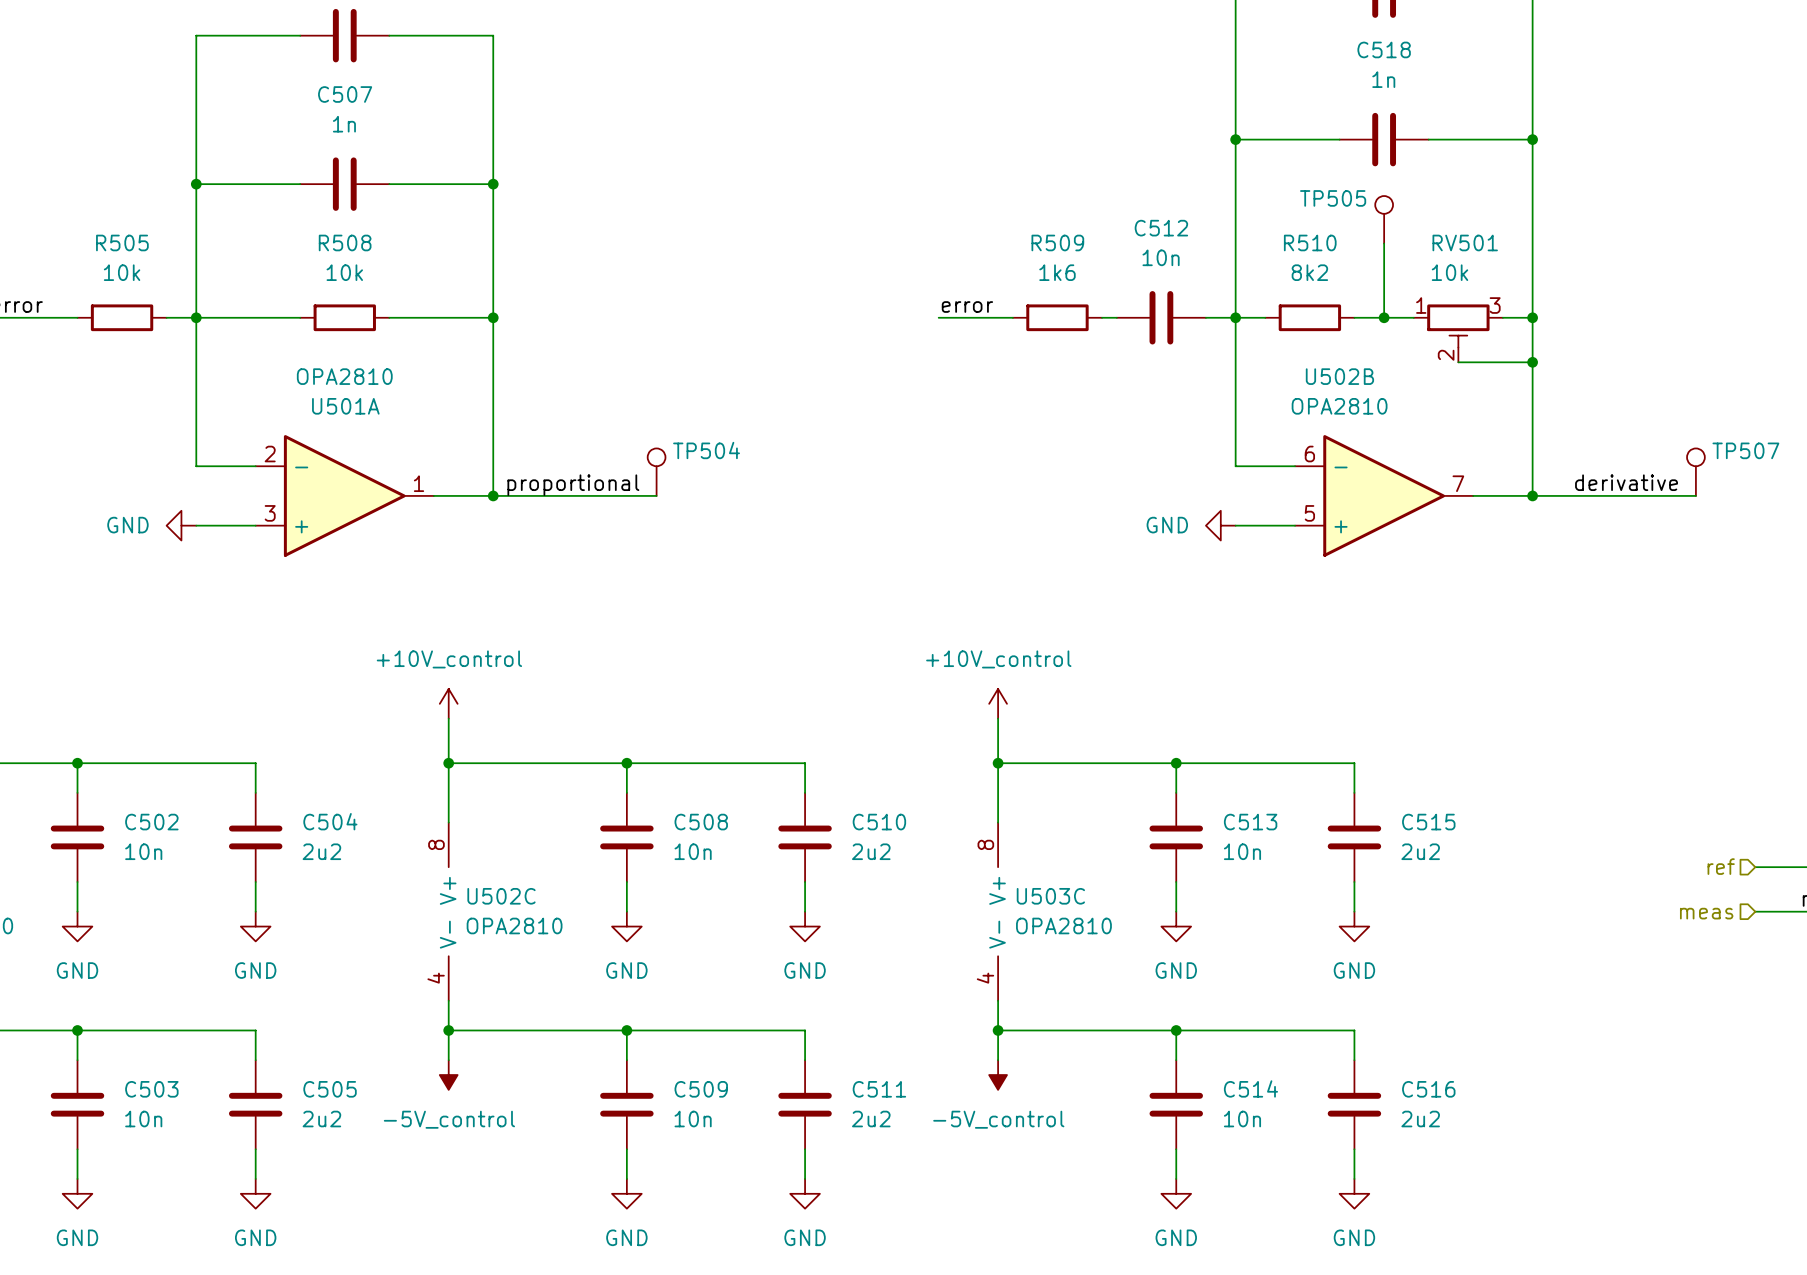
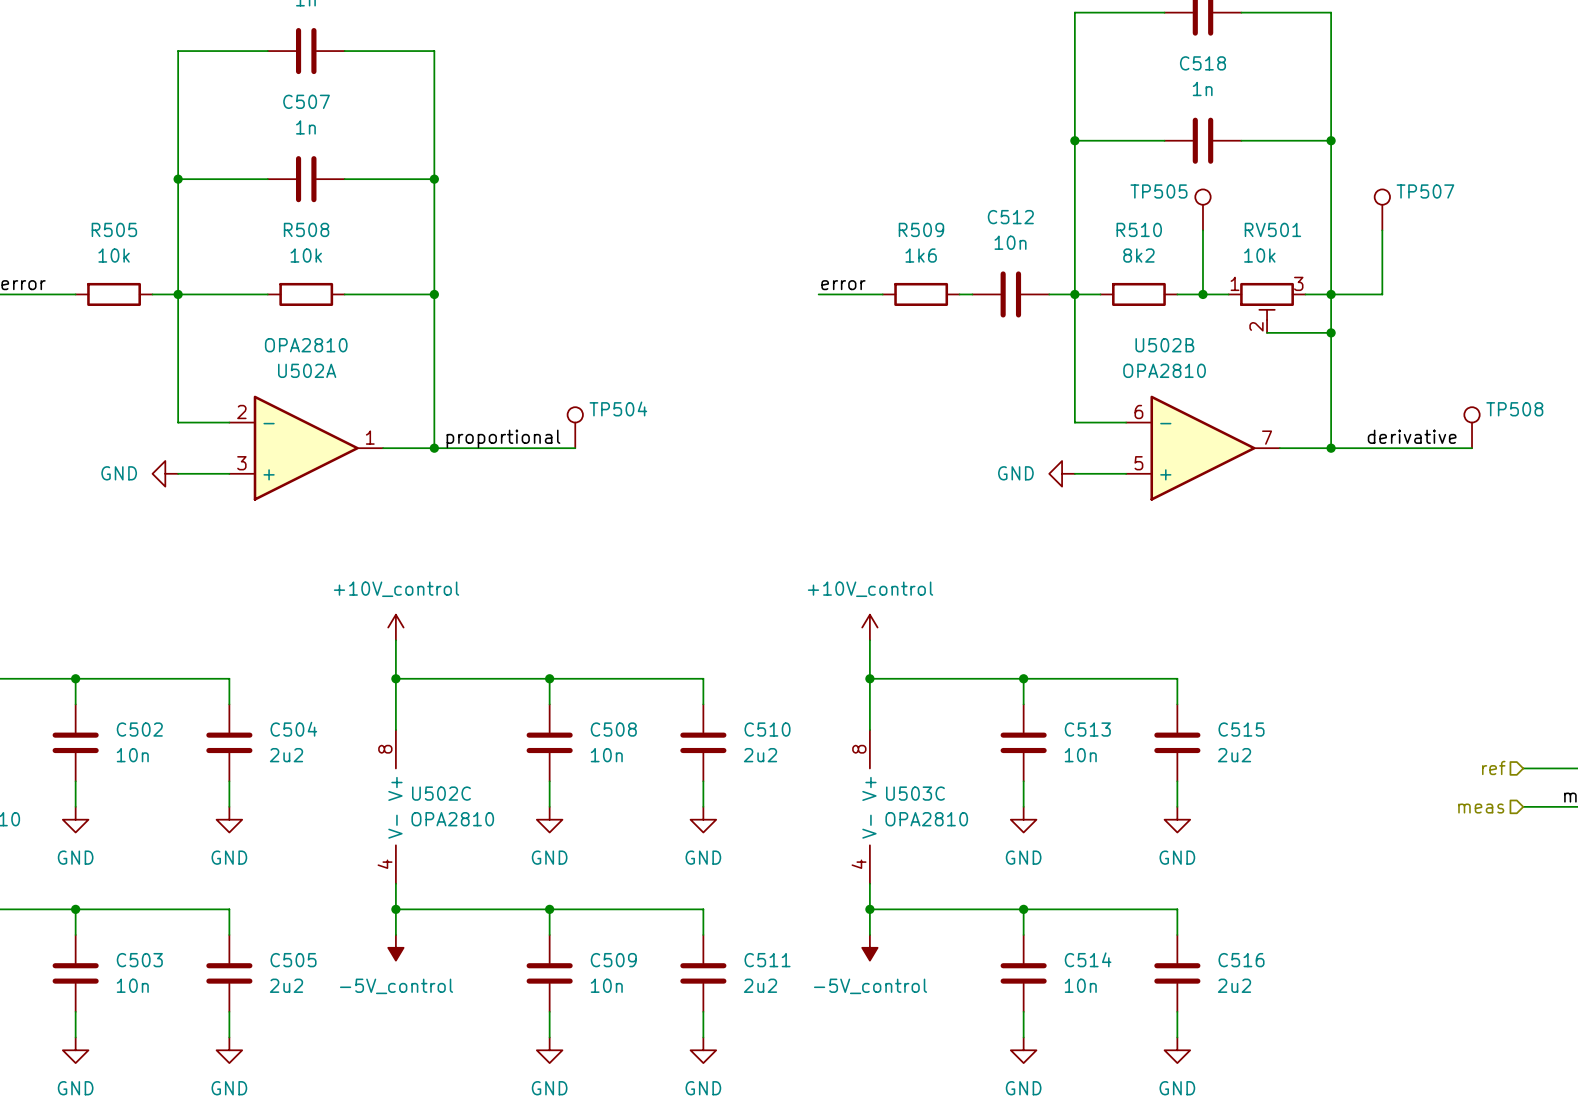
TP507: none -> (1382, 209)
wire: none -> (1382, 230) (1382, 294) (1331, 294)
U501A name: U501A (345, 406) -> U502A (307, 370)
TP507 name: TP507 (1745, 450) -> TP508 (1514, 409)

